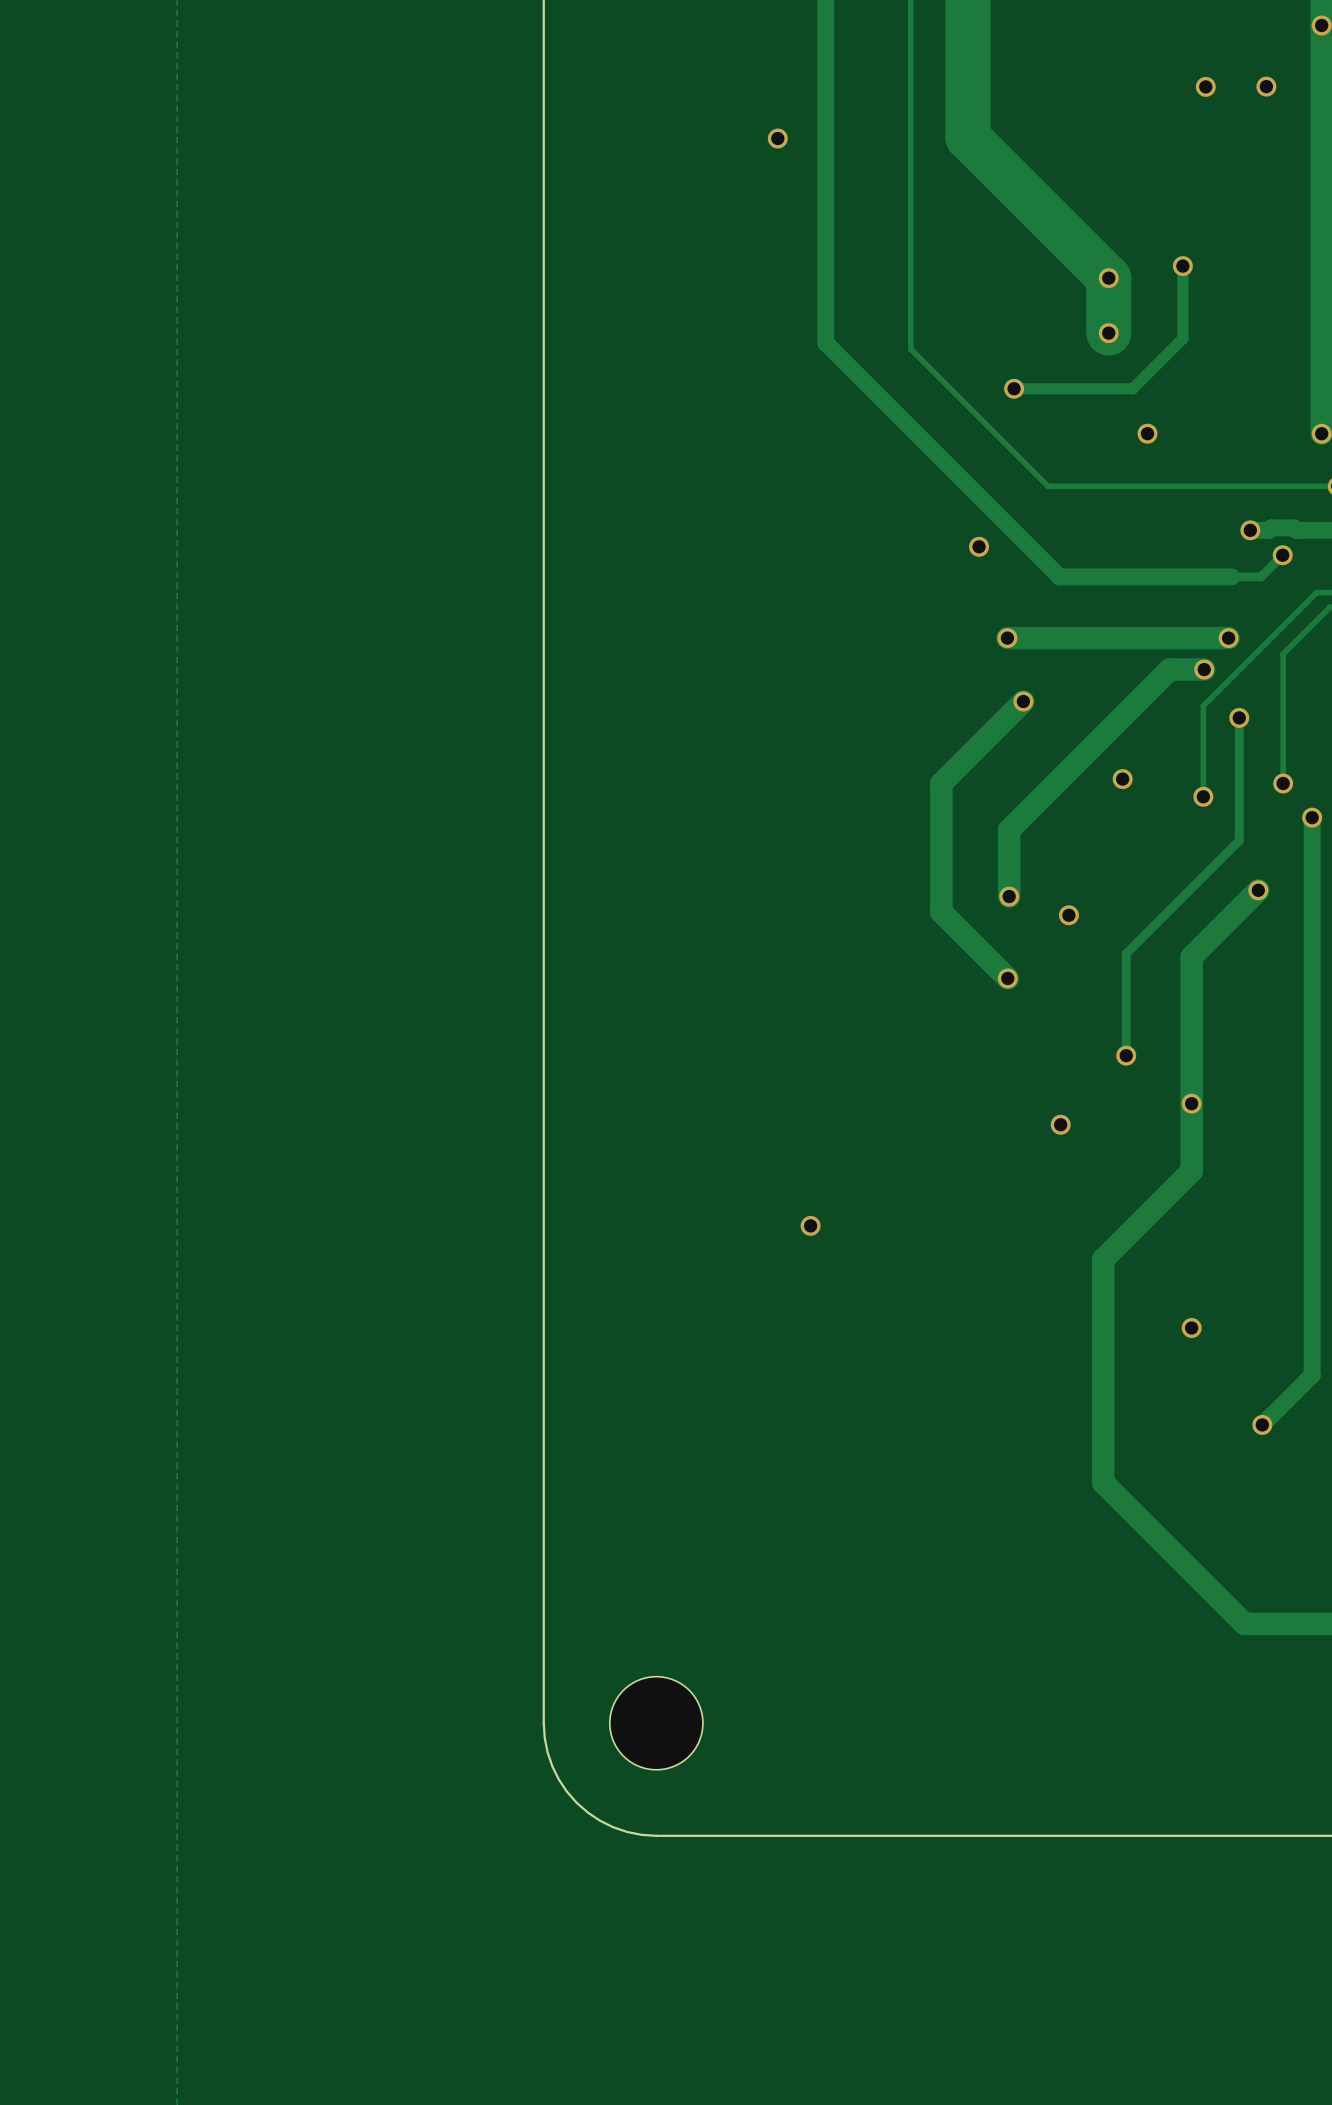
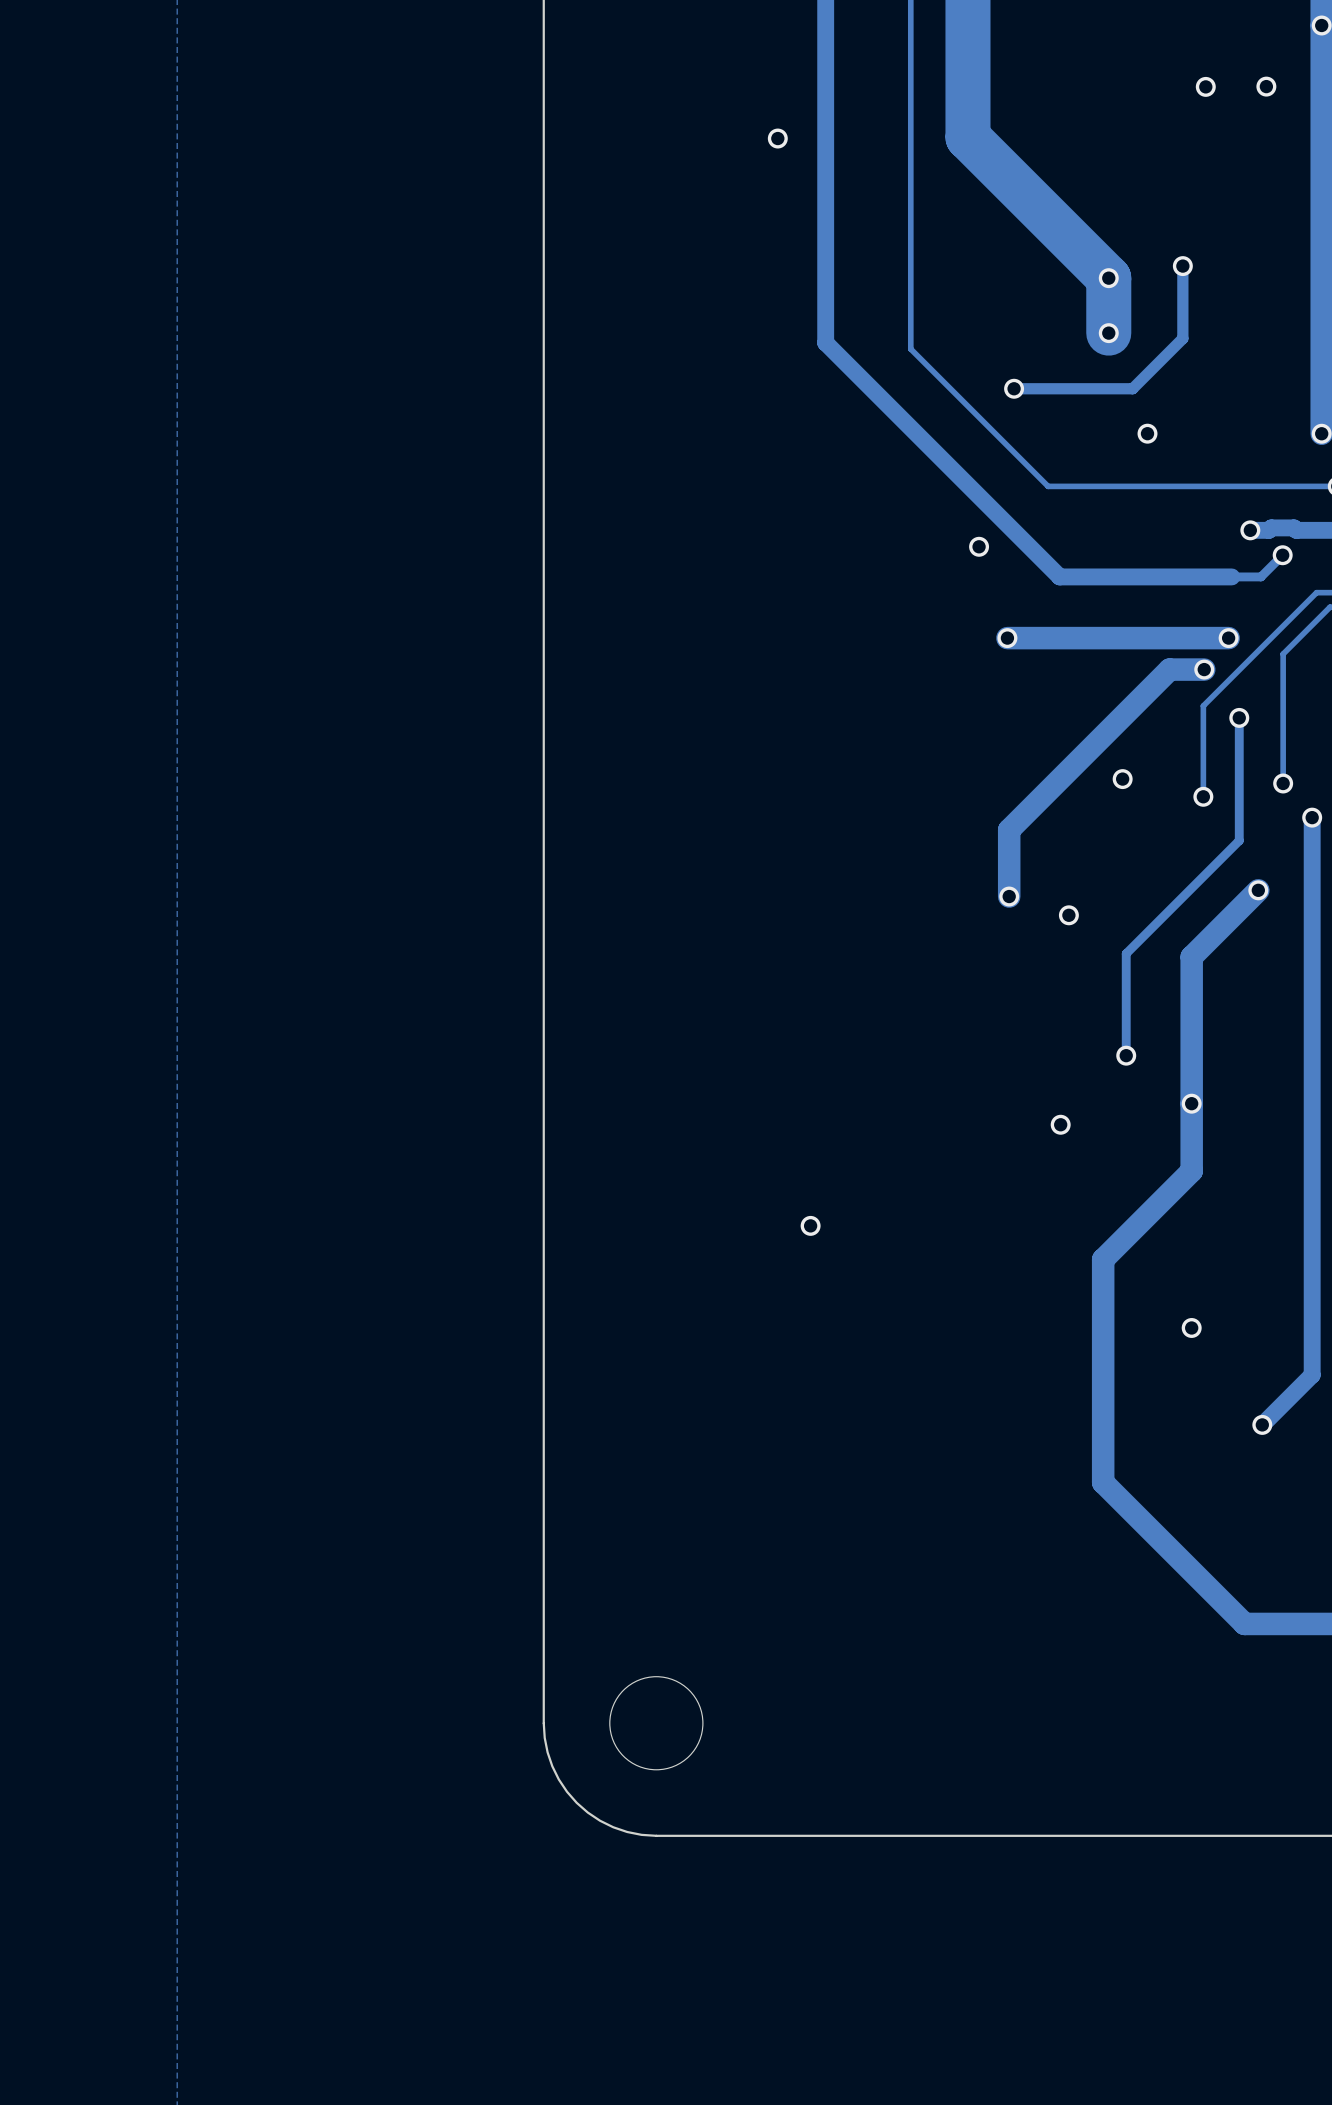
track: (1023, 701) (941, 783) (941, 912) (1007, 978) -> none
via: (1023, 701) -> none
via: (1007, 978) -> none

